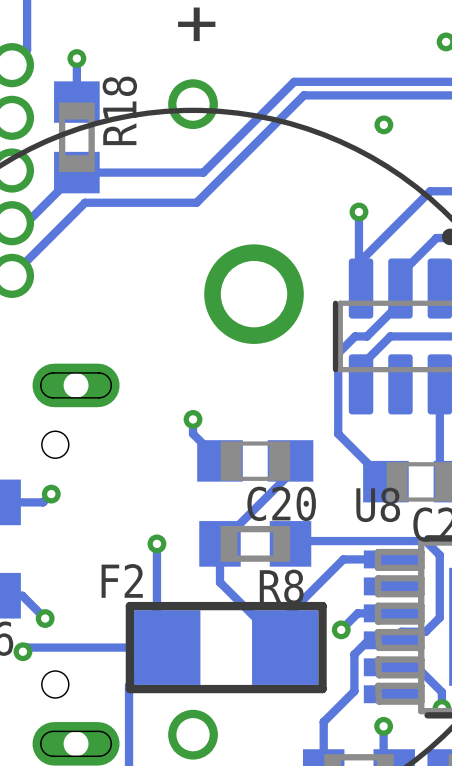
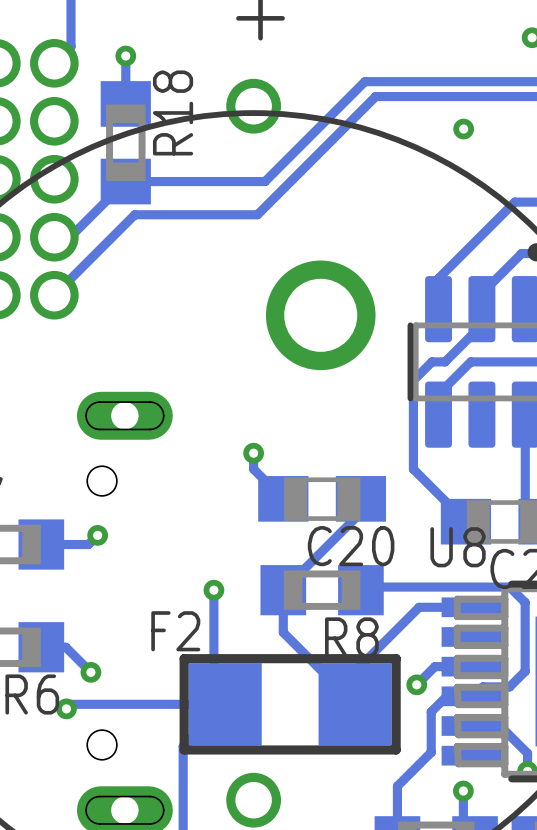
track: (358, 212) (358, 286) (361, 288) -> none
via: (358, 212) -> none

